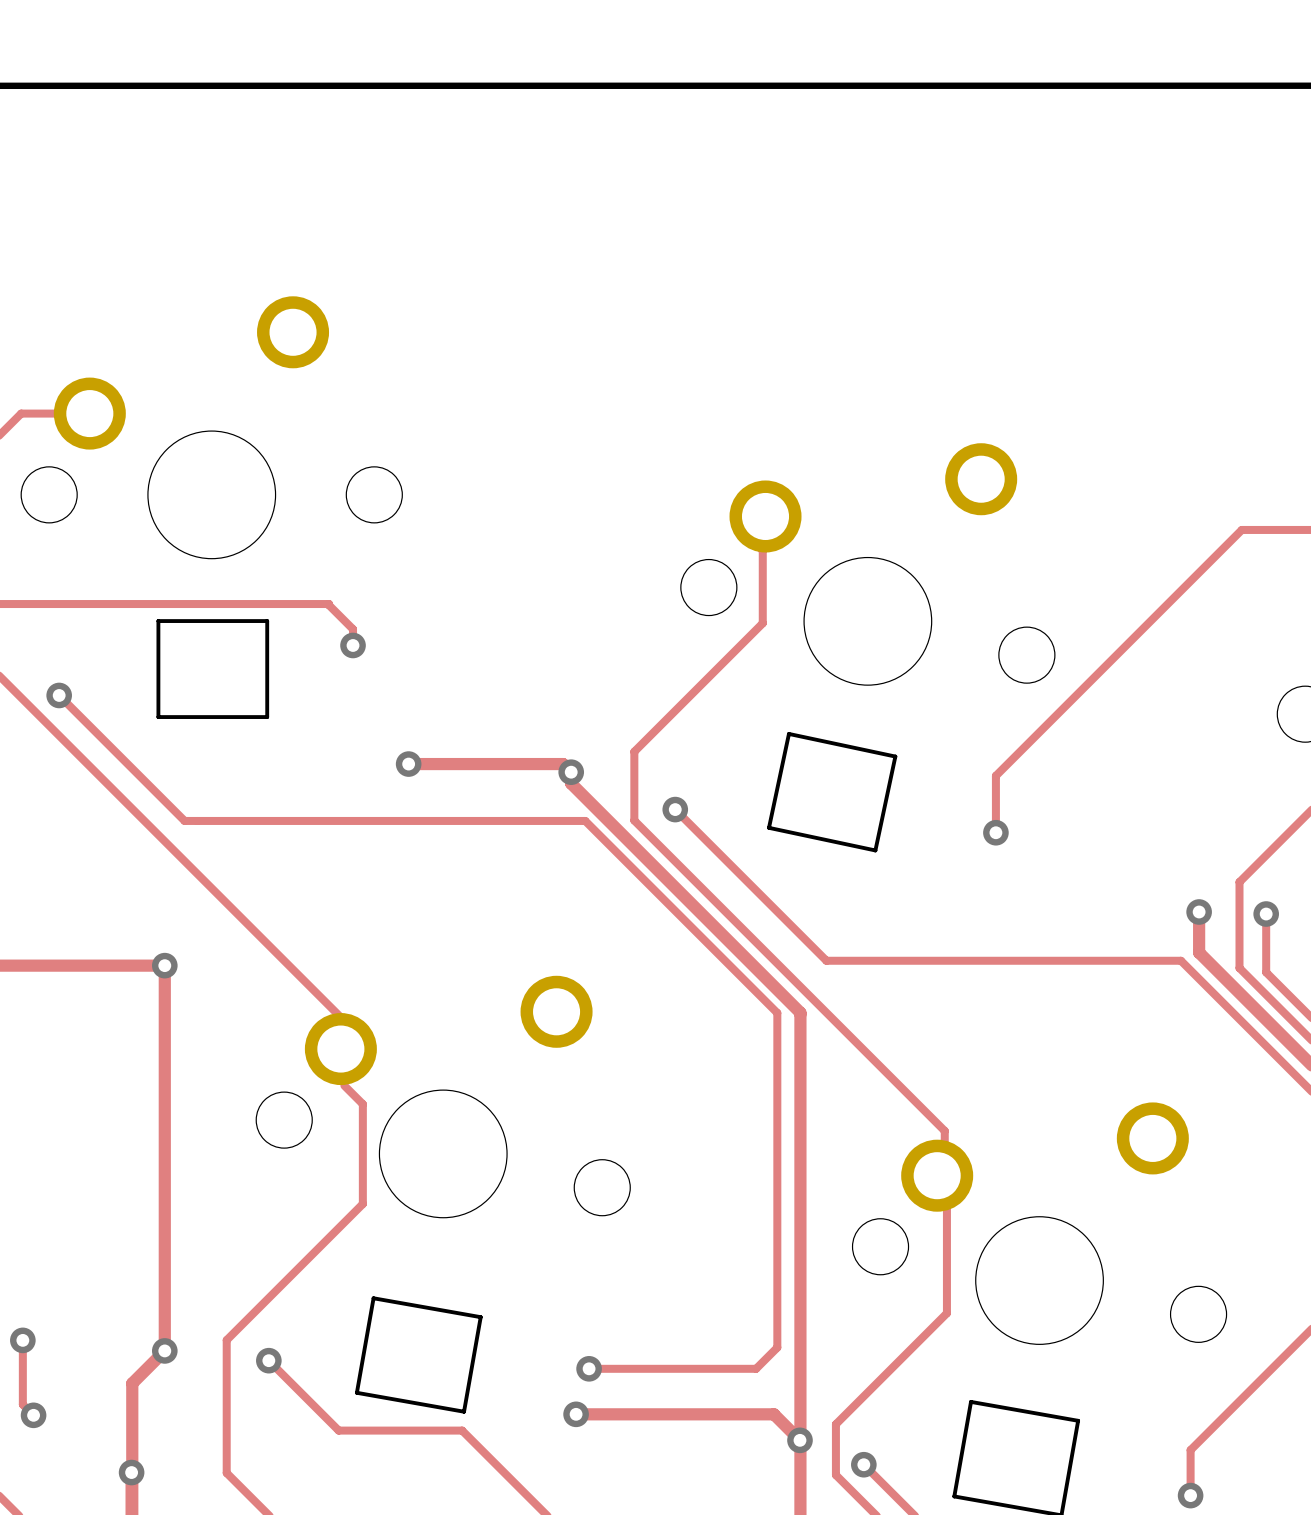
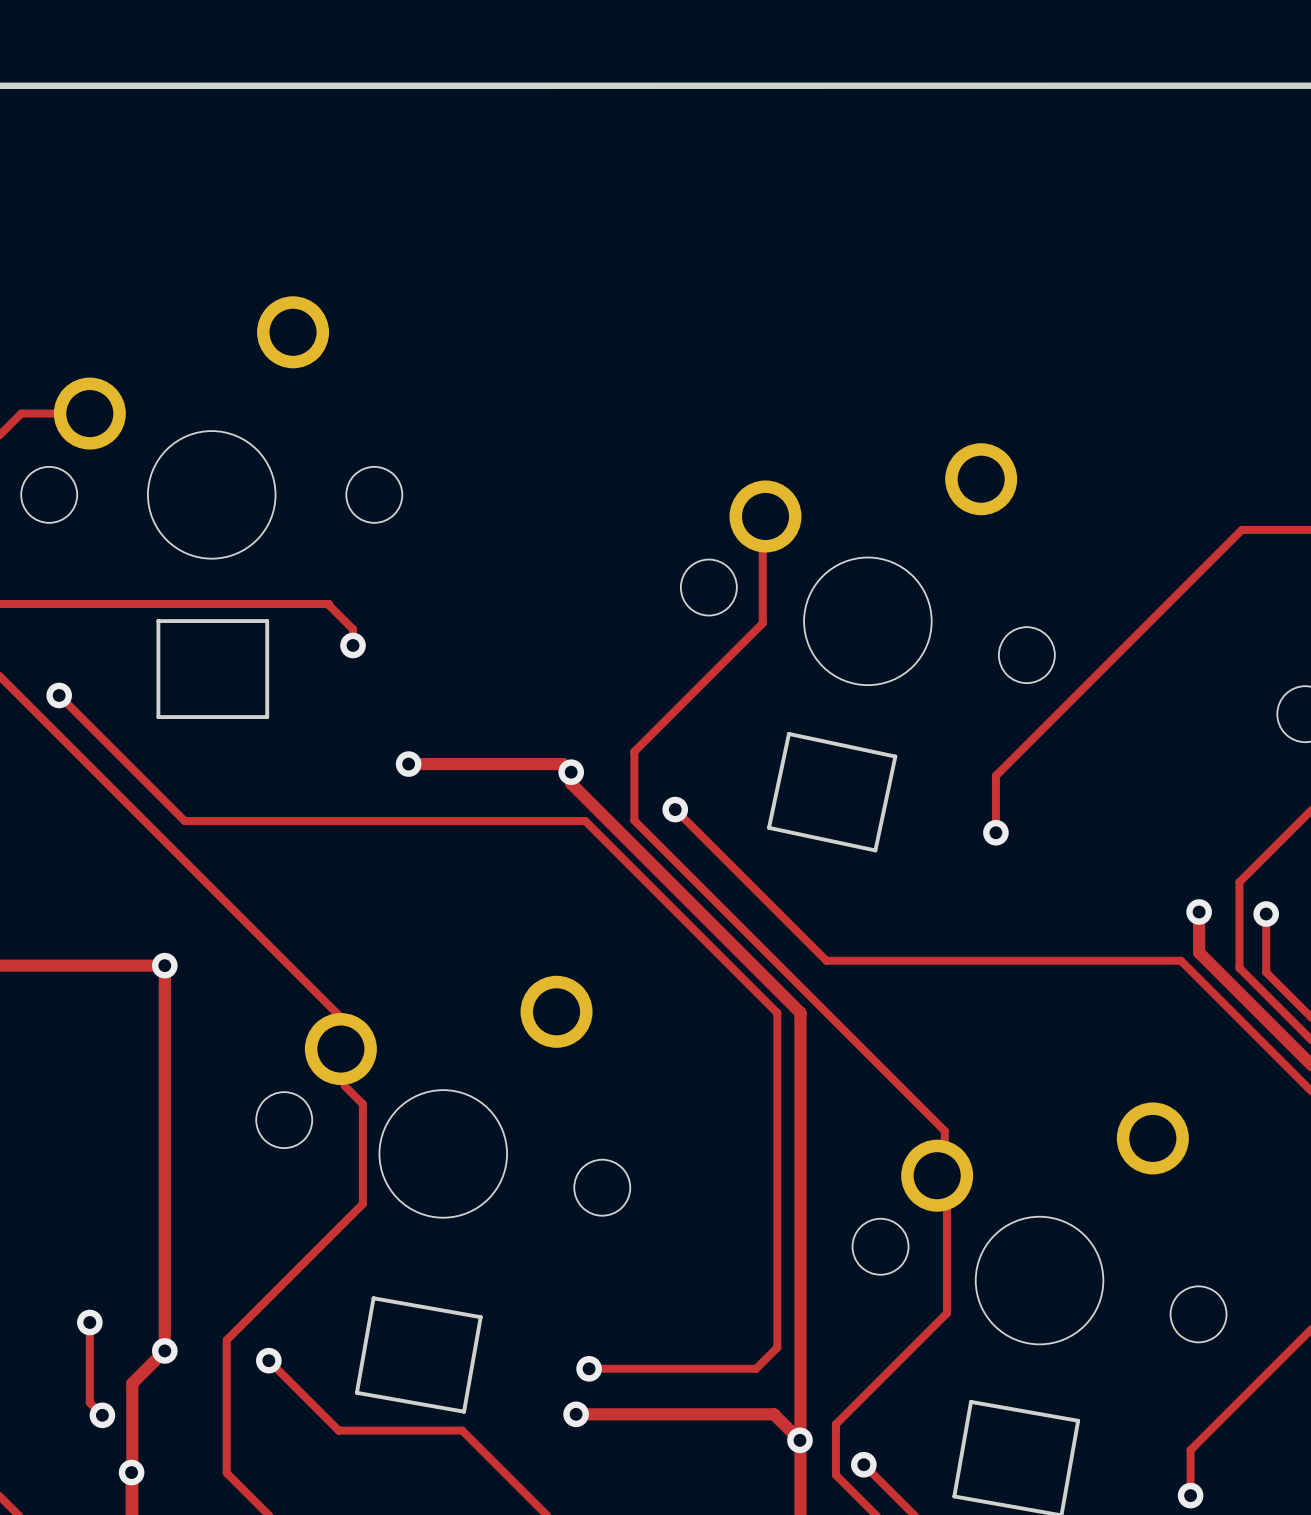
track: none -> (89, 1322) (89, 1402) (102, 1415)
via: none -> (89, 1322)
track: (22, 1340) (22, 1404) (33, 1415) -> none
via: (22, 1340) -> none
via: (33, 1415) -> none
via: none -> (102, 1415)

